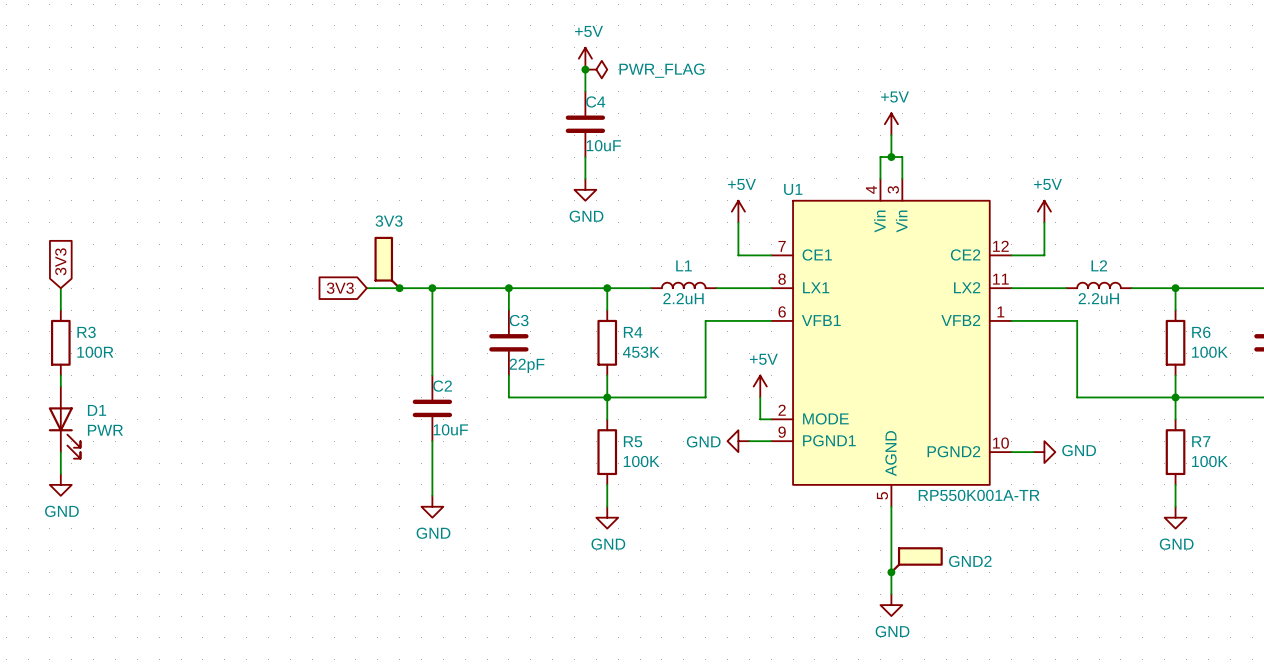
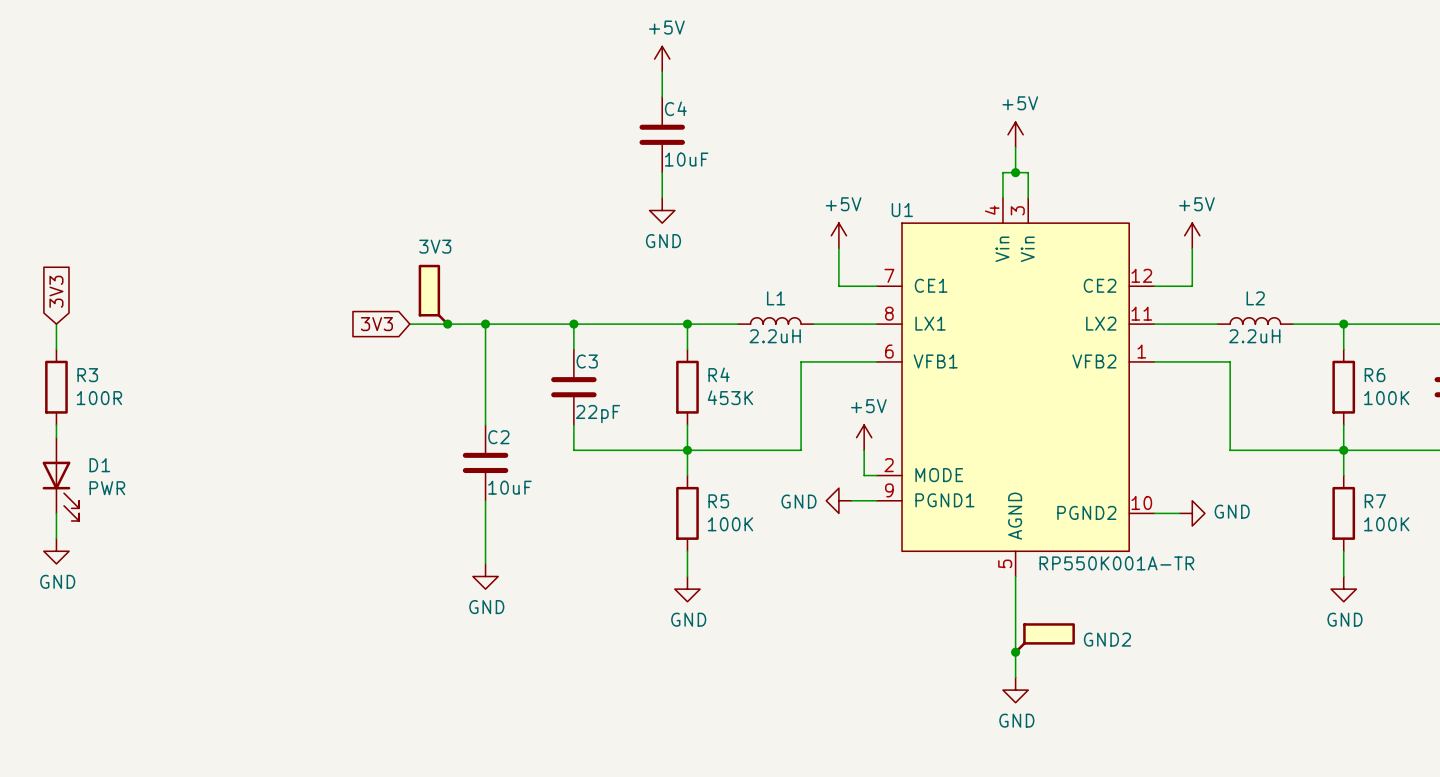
junction: (585, 69) -> none
power symbol: PWR_FLAG (596, 69) -> none

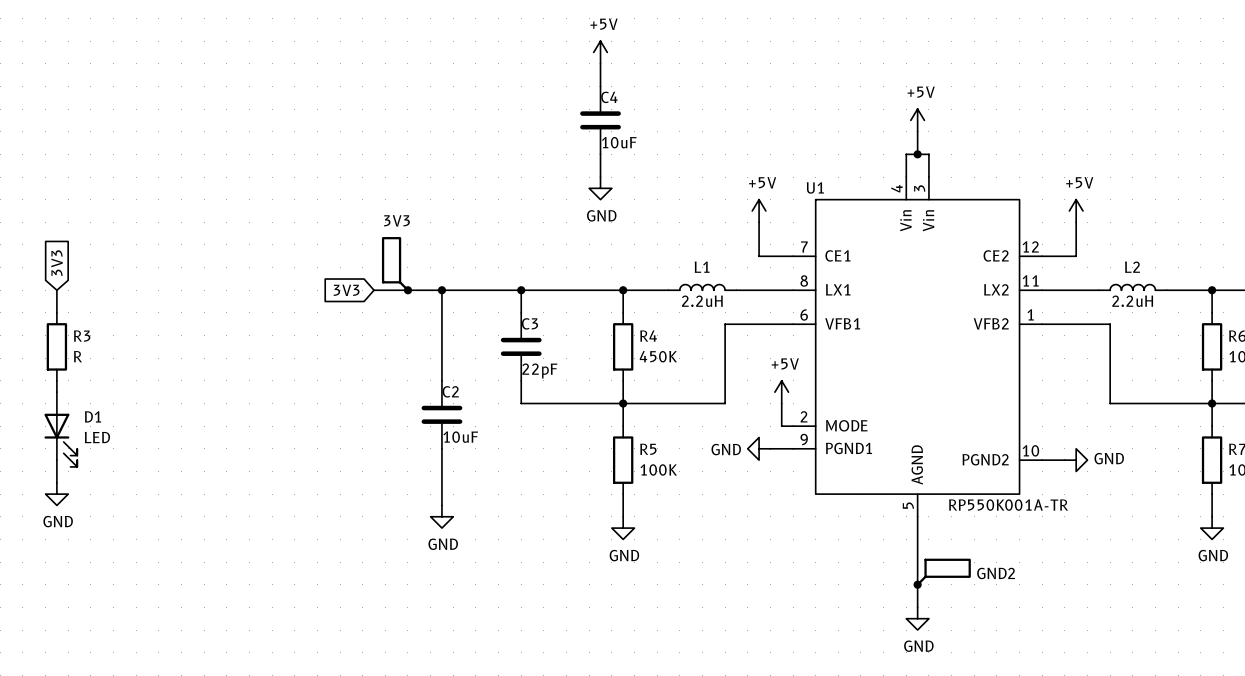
R4 value: 453K (730, 397) -> 450K (658, 356)
R3 value: 100R (99, 398) -> R (77, 356)
D1 value: PWR (107, 488) -> LED (97, 437)

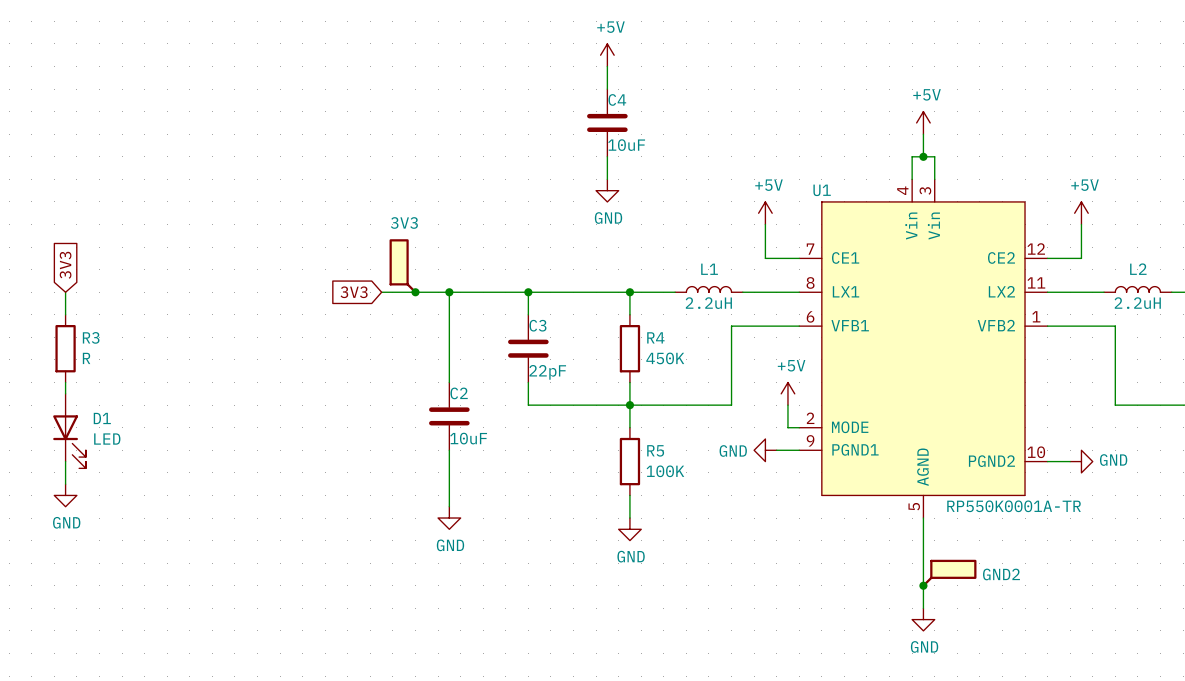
U1 value: RP550K001A-TR (1008, 505) -> RP550K0001A-TR (1014, 506)

